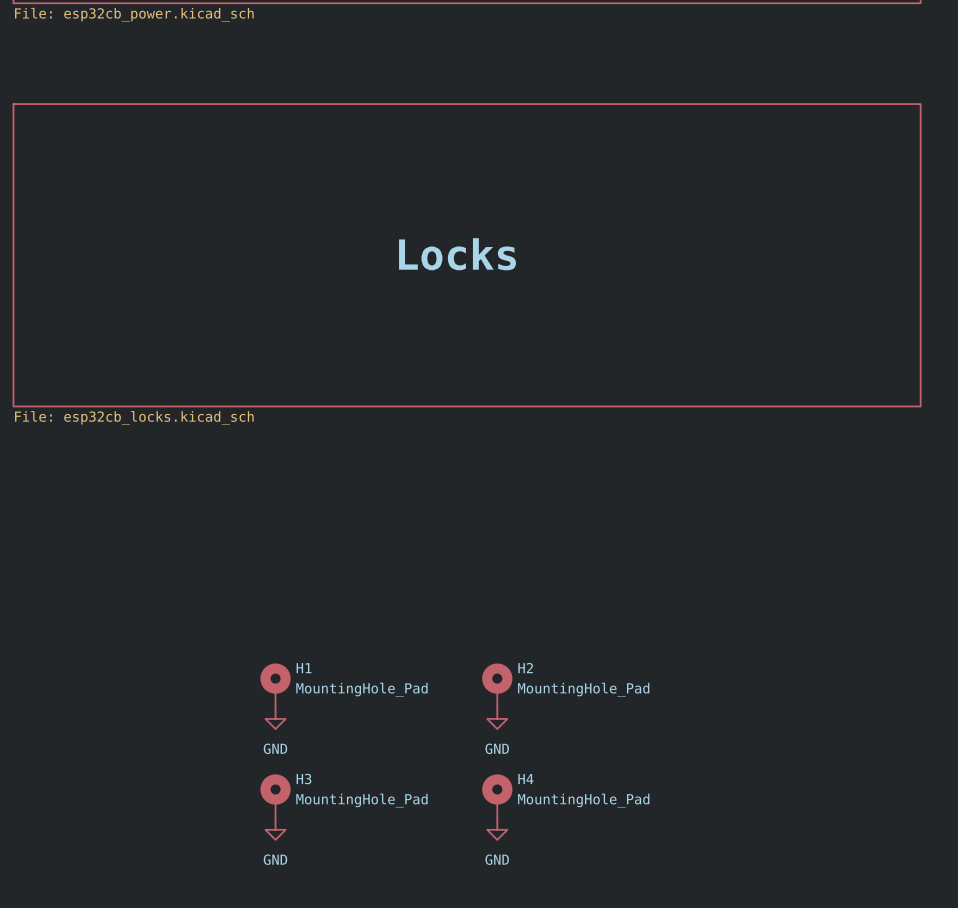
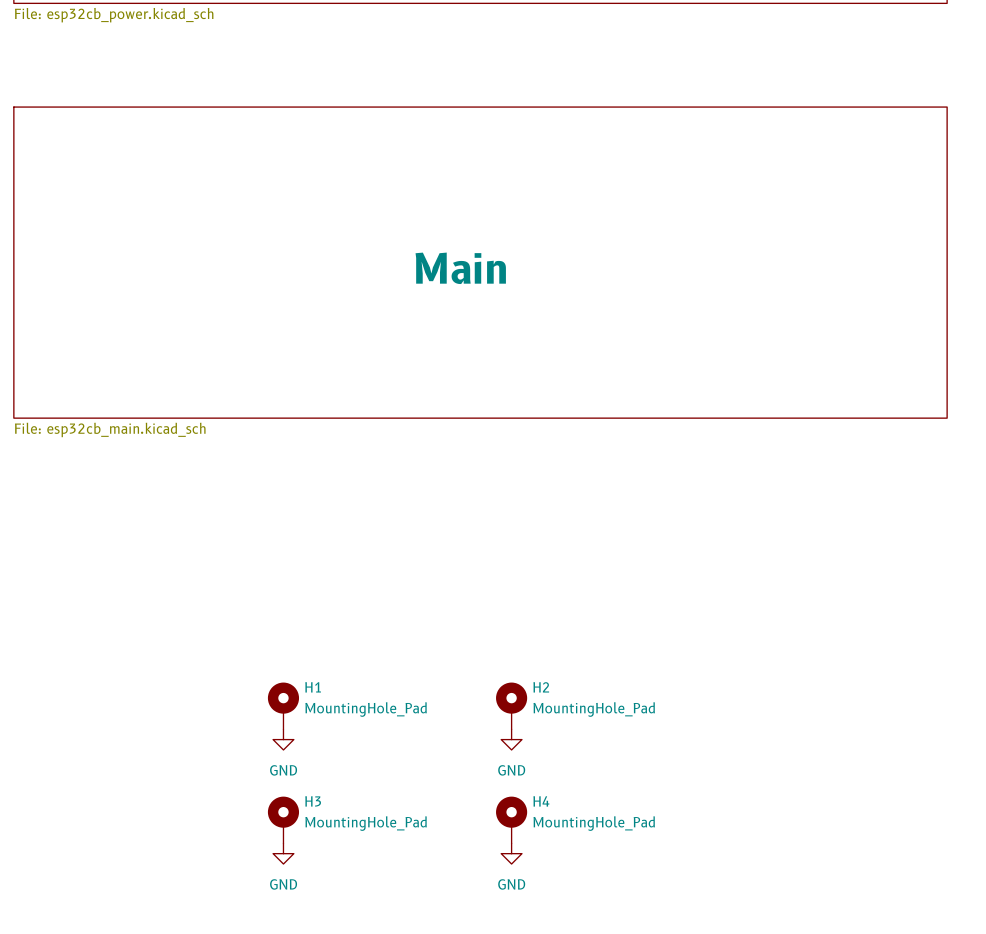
sheet Locks name: Locks (457, 254) -> Main (460, 268)
sheet Locks value: File: esp32cb_locks.kicad_sch (134, 418) -> File: esp32cb_main.kicad_sch (110, 429)

